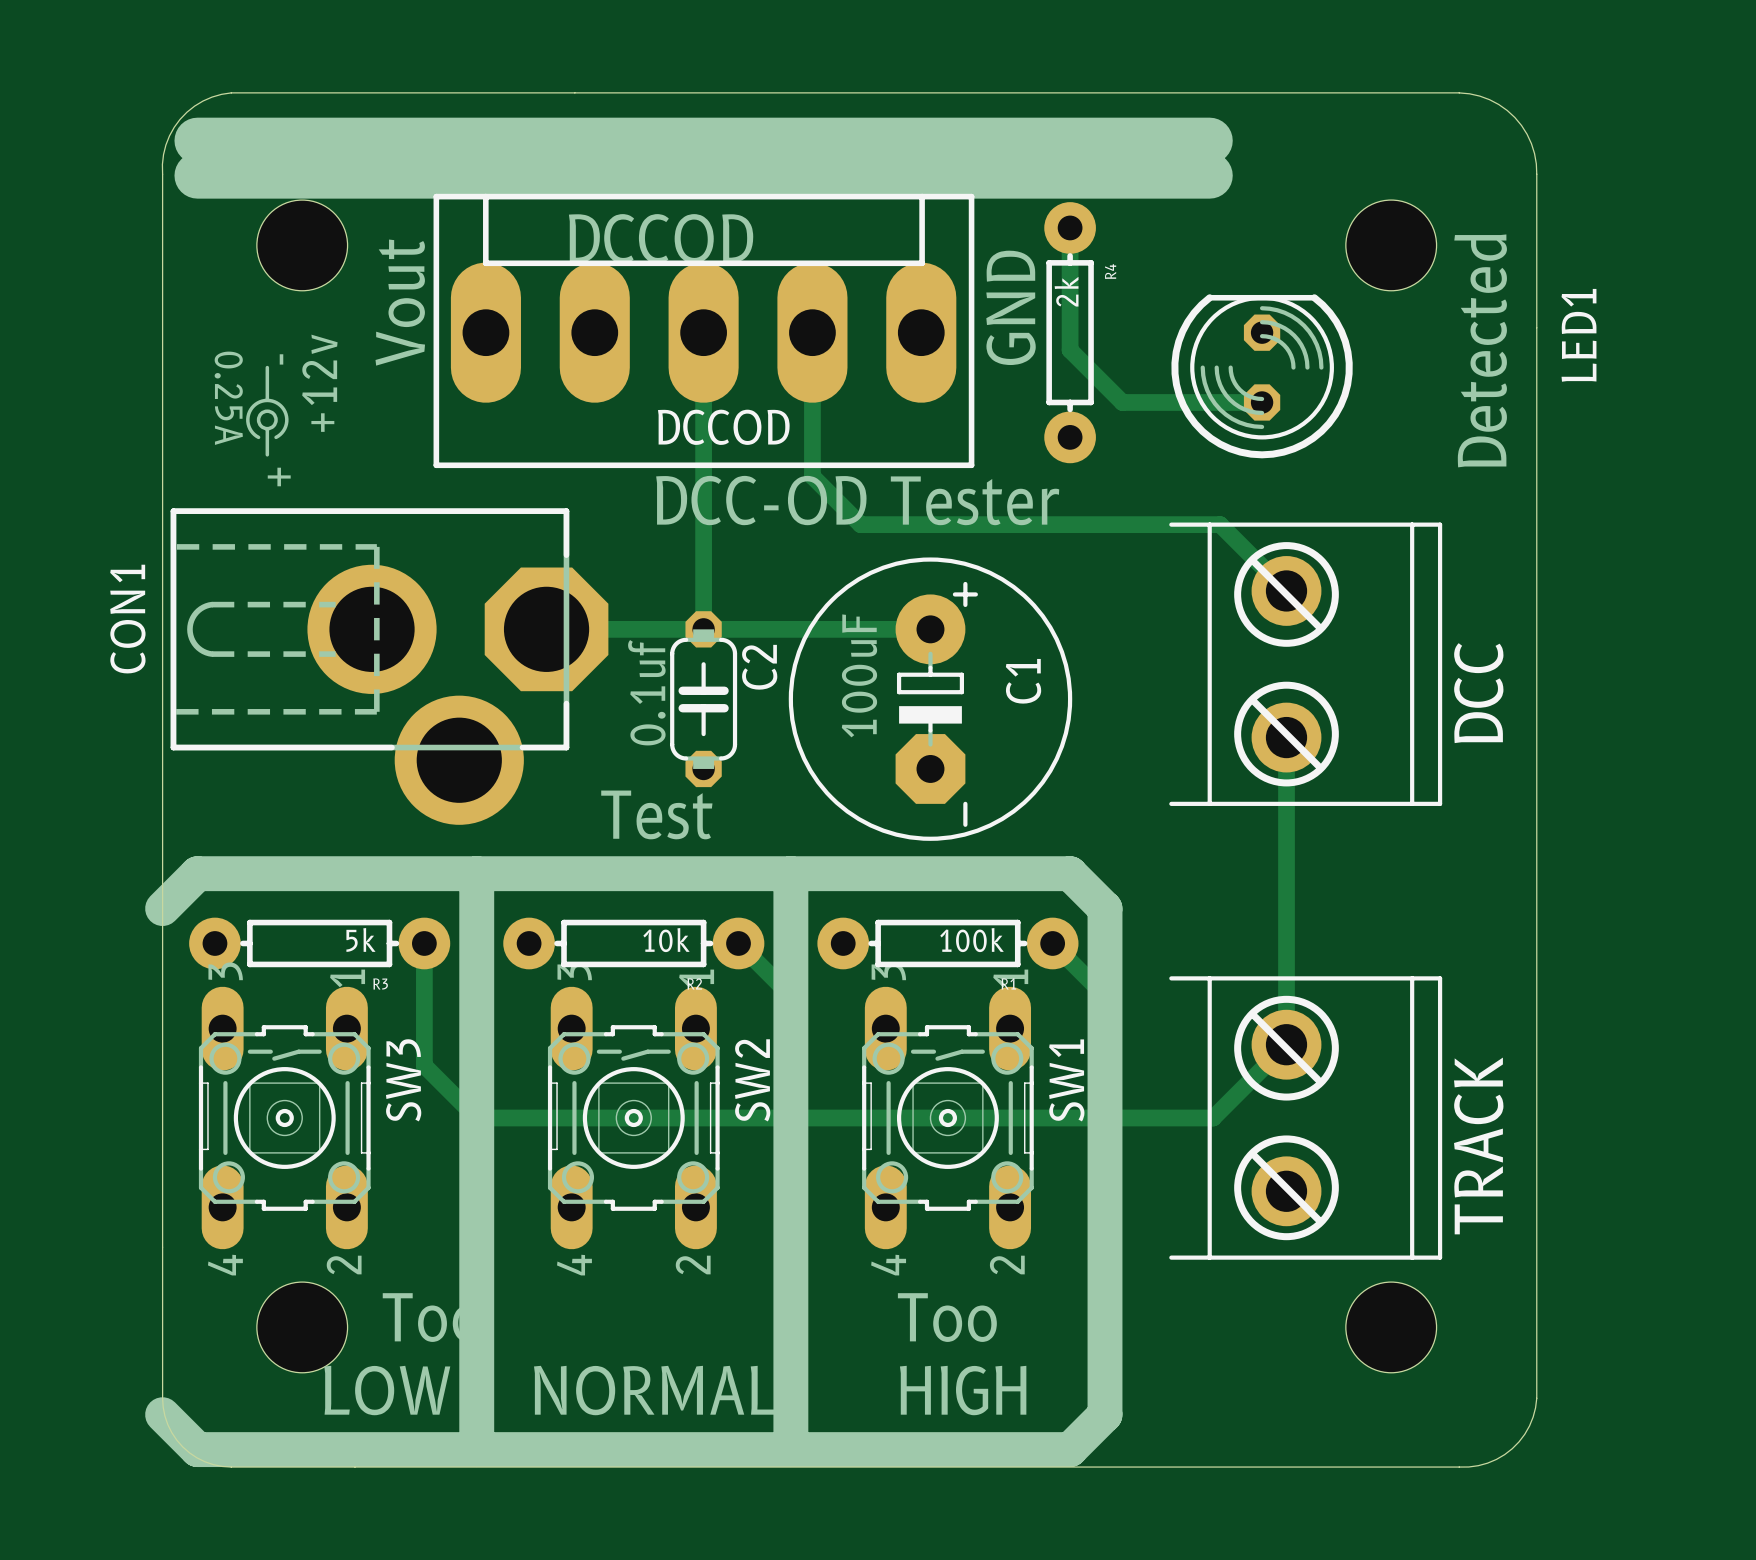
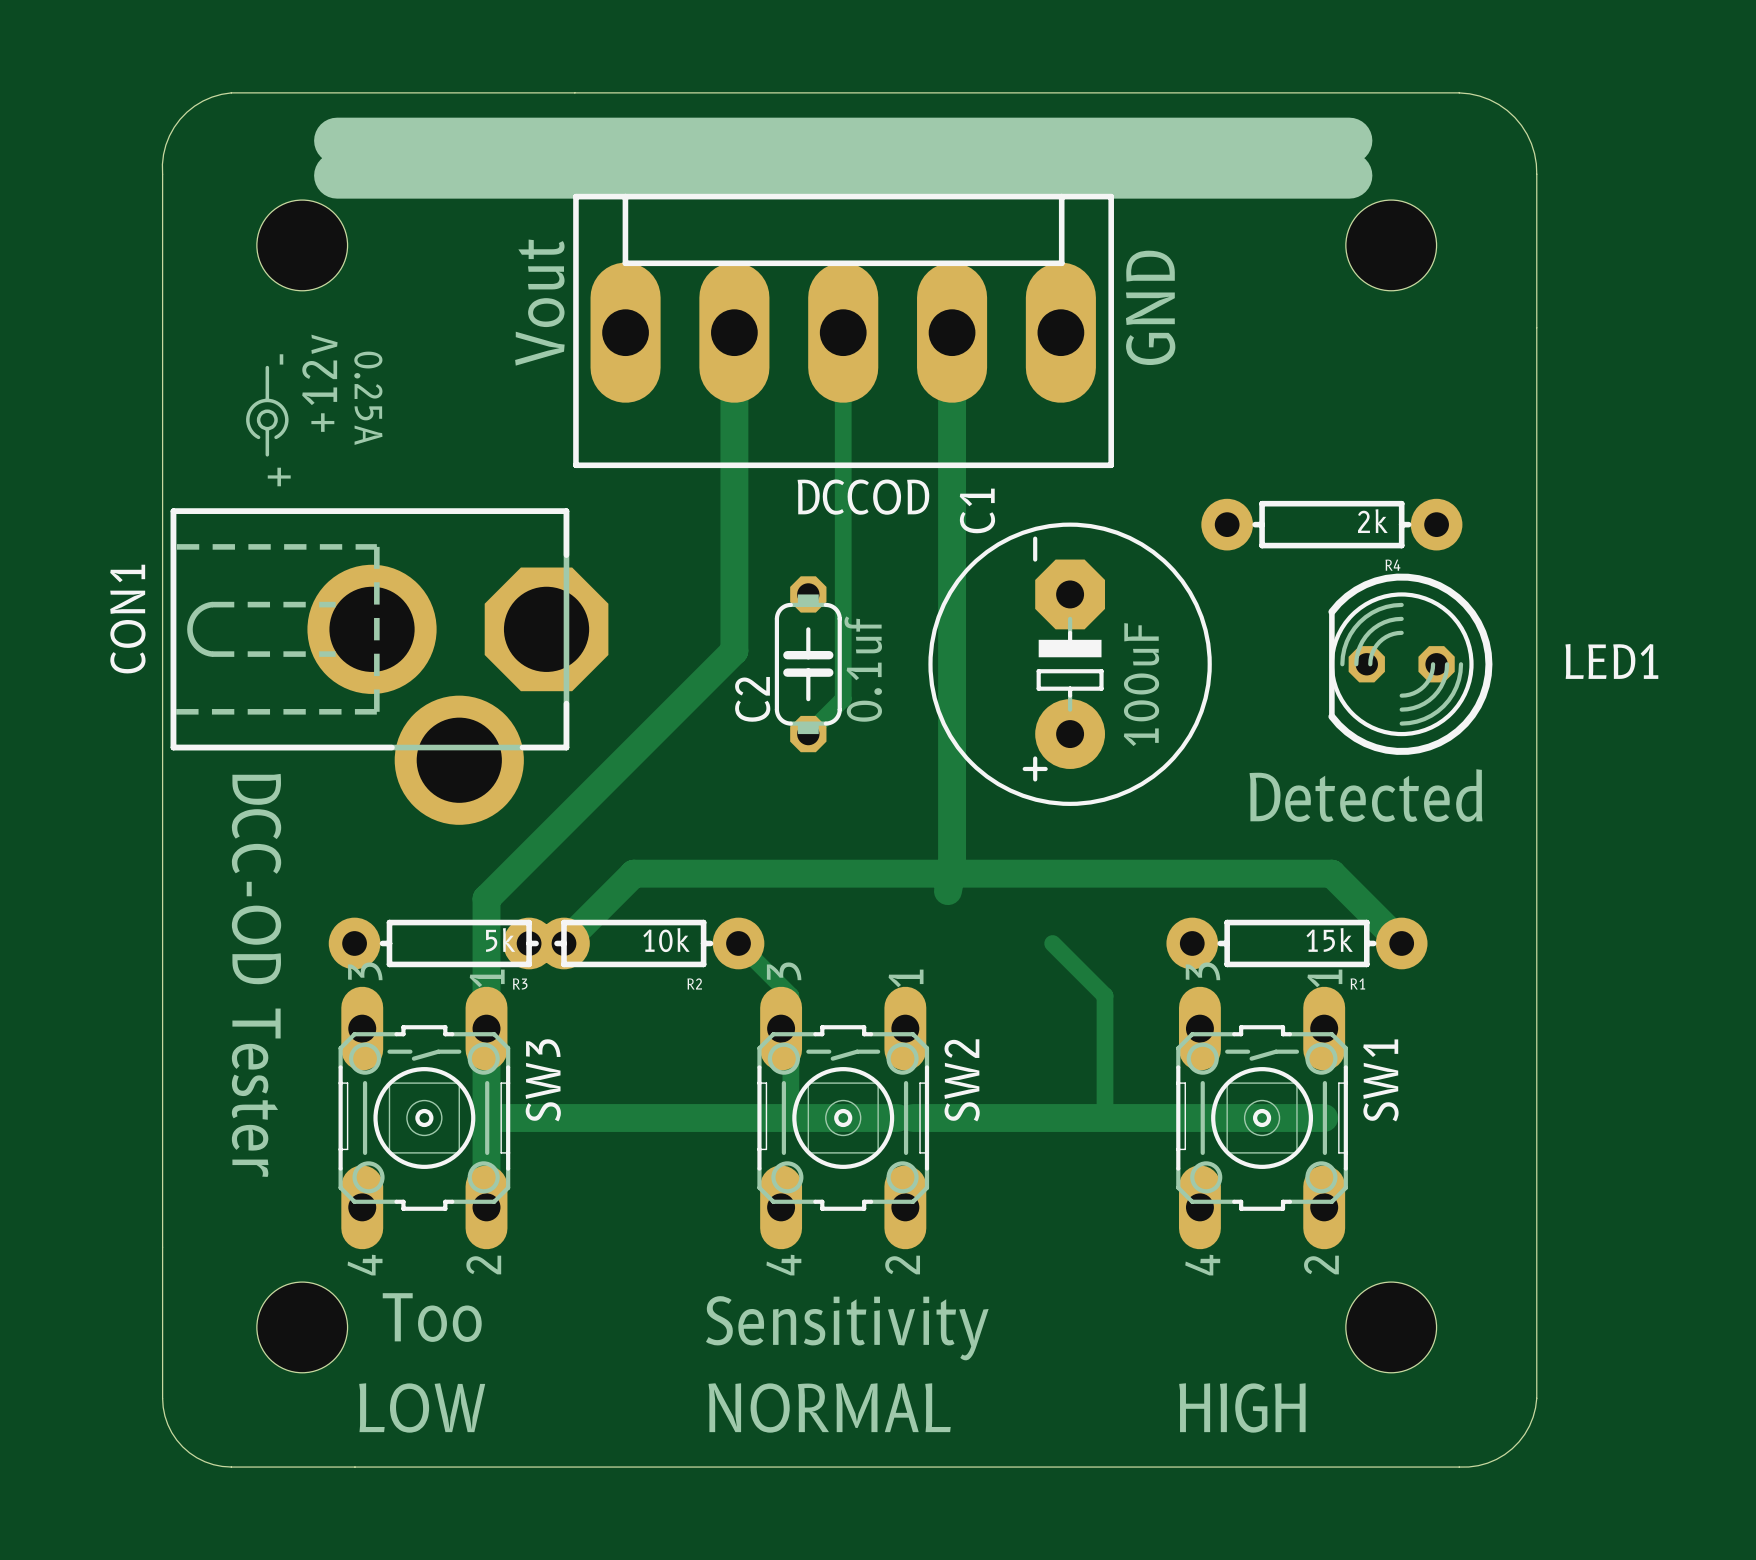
line: (197, 140) (337, 140) -> none
line: none -> (1209, 140) (1349, 140)
line: (197, 175) (337, 175) -> none
line: none -> (1209, 175) (1349, 175)
track: (1070, 227) (1070, 350) (1122, 402) (1262, 402) -> none
text: DCCOD (661, 238) -> none
text position: Vout (400, 302) -> Vout (539, 302)
text position: GND (1011, 307) -> GND (1150, 307)
DCCOD position: (703, 330) -> (843, 330)
track: (703, 332) (703, 629) -> none
track: none -> (734, 332) (734, 650) (486, 898) (486, 1207)
track: (812, 332) (812, 476) (860, 524) (1220, 524) (1286, 590) -> none
track: none -> (843, 332) (843, 699) (808, 734)
track: none -> (952, 332) (952, 869) (947, 891)
R4 rotation: 0° (1070, 332) -> 90° clockwise (1331, 524)
R4 position: (1070, 332) -> (1331, 524)
LED1 name position: LED1 (1578, 335) -> LED1 (1611, 661)
text rotation: 0° (1480, 350) -> 90° clockwise (1365, 795)
text position: Detected (1480, 350) -> Detected (1365, 795)
LED1 rotation: 0° (1262, 376) -> 90° counterclockwise (1410, 664)
LED1 position: (1262, 376) -> (1410, 664)
text position: 0.25A (228, 398) -> 0.25A (368, 398)
DCCOD name position: DCCOD (723, 427) -> DCCOD (863, 497)
text rotation: 0° (857, 500) -> 90° clockwise (256, 975)
text position: DCC-OD Tester (857, 500) -> DCC-OD Tester (256, 975)
track: (546, 629) (930, 629) -> none
DCC: (1305, 664) -> none
C1 name position: C1 (1023, 681) -> C1 (977, 510)
C2 rotation: 0° (703, 699) -> 180° (808, 664)
C2 position: (703, 699) -> (808, 664)
C1 rotation: 0° (930, 699) -> 180° (1070, 664)
track: (1286, 737) (1286, 1044) (1213, 1118) -> (1324, 1118) (1213, 1118)
text: Test (656, 814) -> none
line: (476, 873) (476, 1449) -> none
line: (790, 873) (790, 1449) -> none
line: (162, 908) (197, 873) (1070, 873) (1105, 908) (1105, 1414) (1070, 1449) (197, 1449) (162, 1414) -> none
R1 value: 100k (972, 940) -> 15k (1329, 939)
R3 position: (319, 943) -> (459, 943)
track: (424, 943) (424, 1065) (476, 1118) (486, 1118) -> none
track: none -> (564, 943) (633, 873) (1331, 873) (1401, 943)
R1 position: (947, 943) -> (1296, 943)
SW3 position: (284, 1118) -> (424, 1118)
track width: thin (486, 1118) (897, 1118) -> thick (486, 1118) (897, 1118)
SW2 position: (633, 1118) -> (843, 1118)
track width: thin (913, 1118) (1213, 1118) -> thick (913, 1118) (1213, 1118)
SW1 position: (947, 1118) -> (1262, 1118)
TRACK: (1305, 1118) -> none
text: Too (947, 1317) -> none
text: none -> Sensitivity (847, 1328)
text position: LOW (387, 1390) -> LOW (422, 1407)
text position: NORMAL (655, 1390) -> NORMAL (829, 1407)
text position: HIGH (963, 1390) -> HIGH (1242, 1407)

